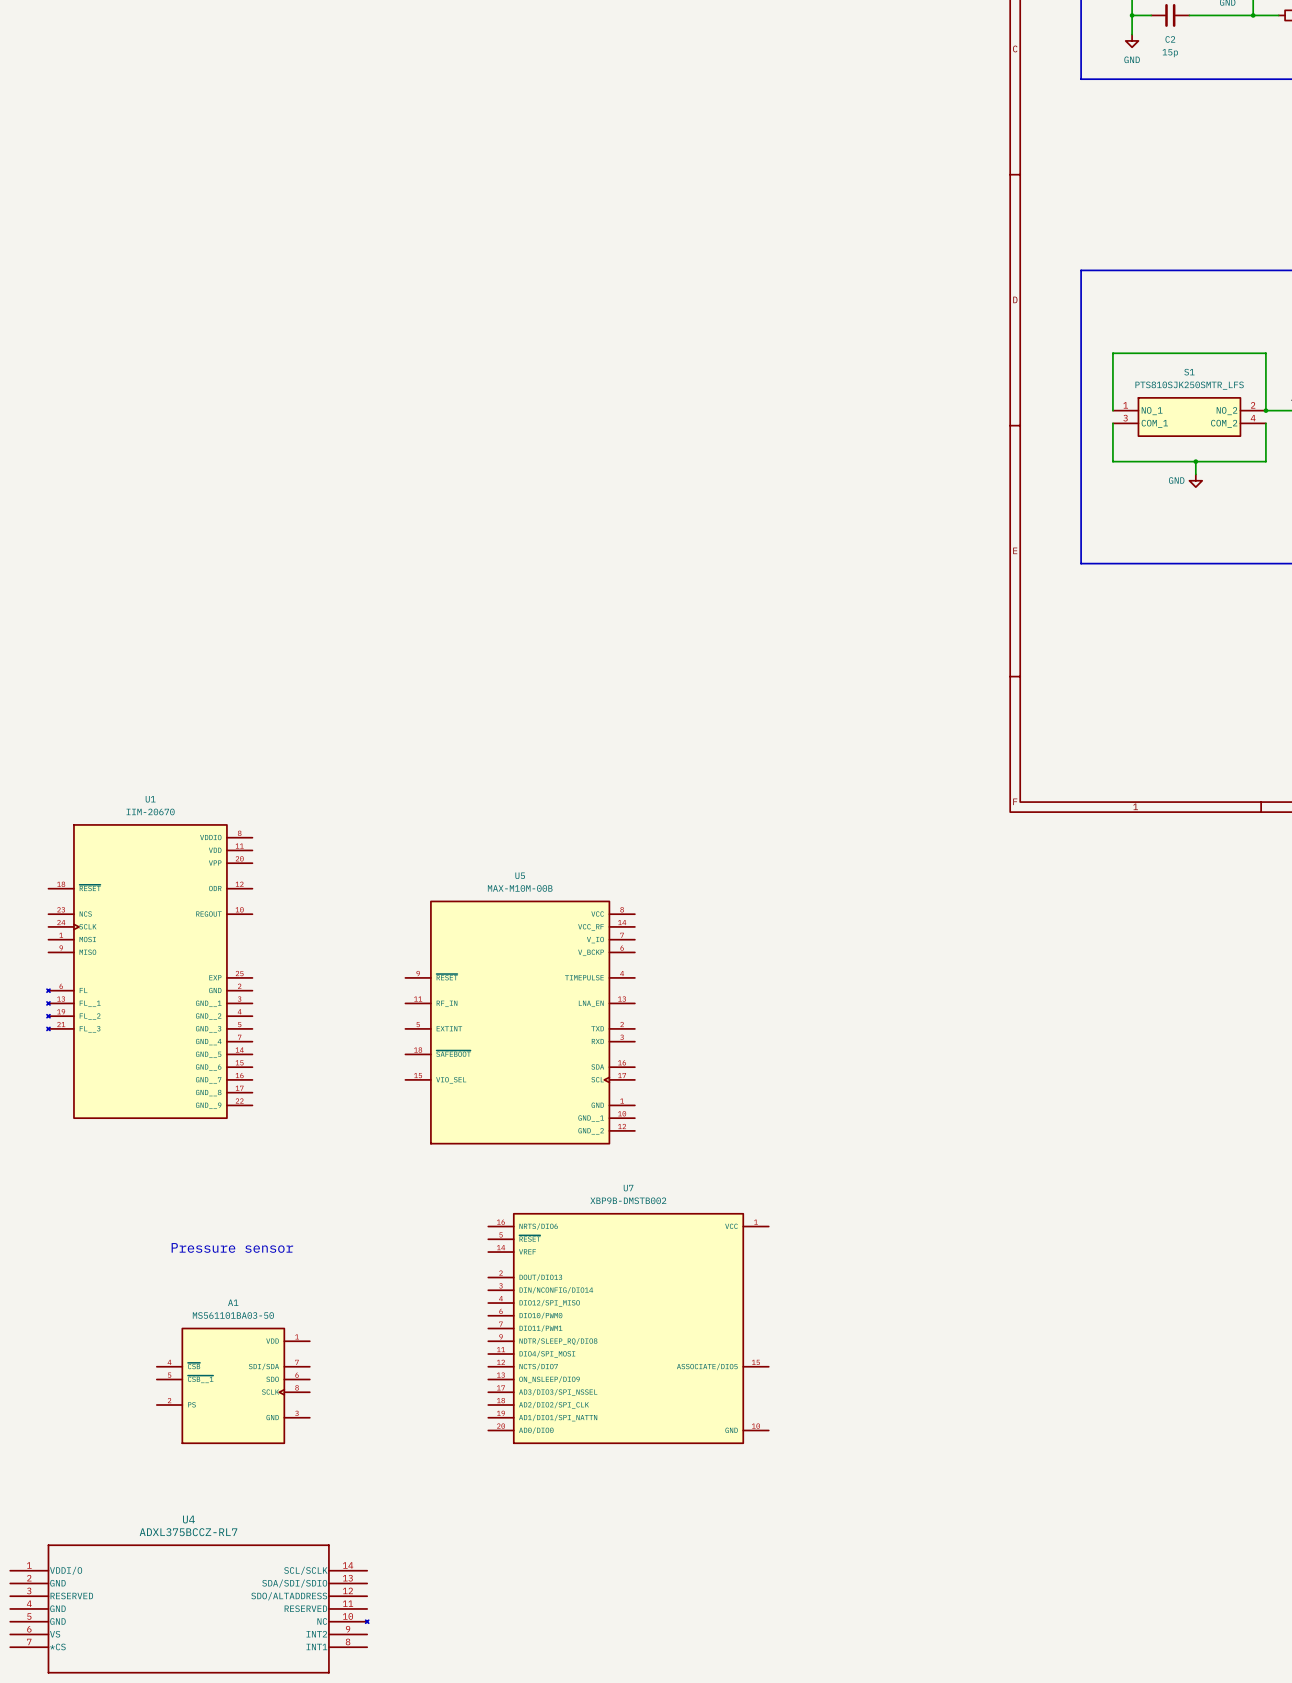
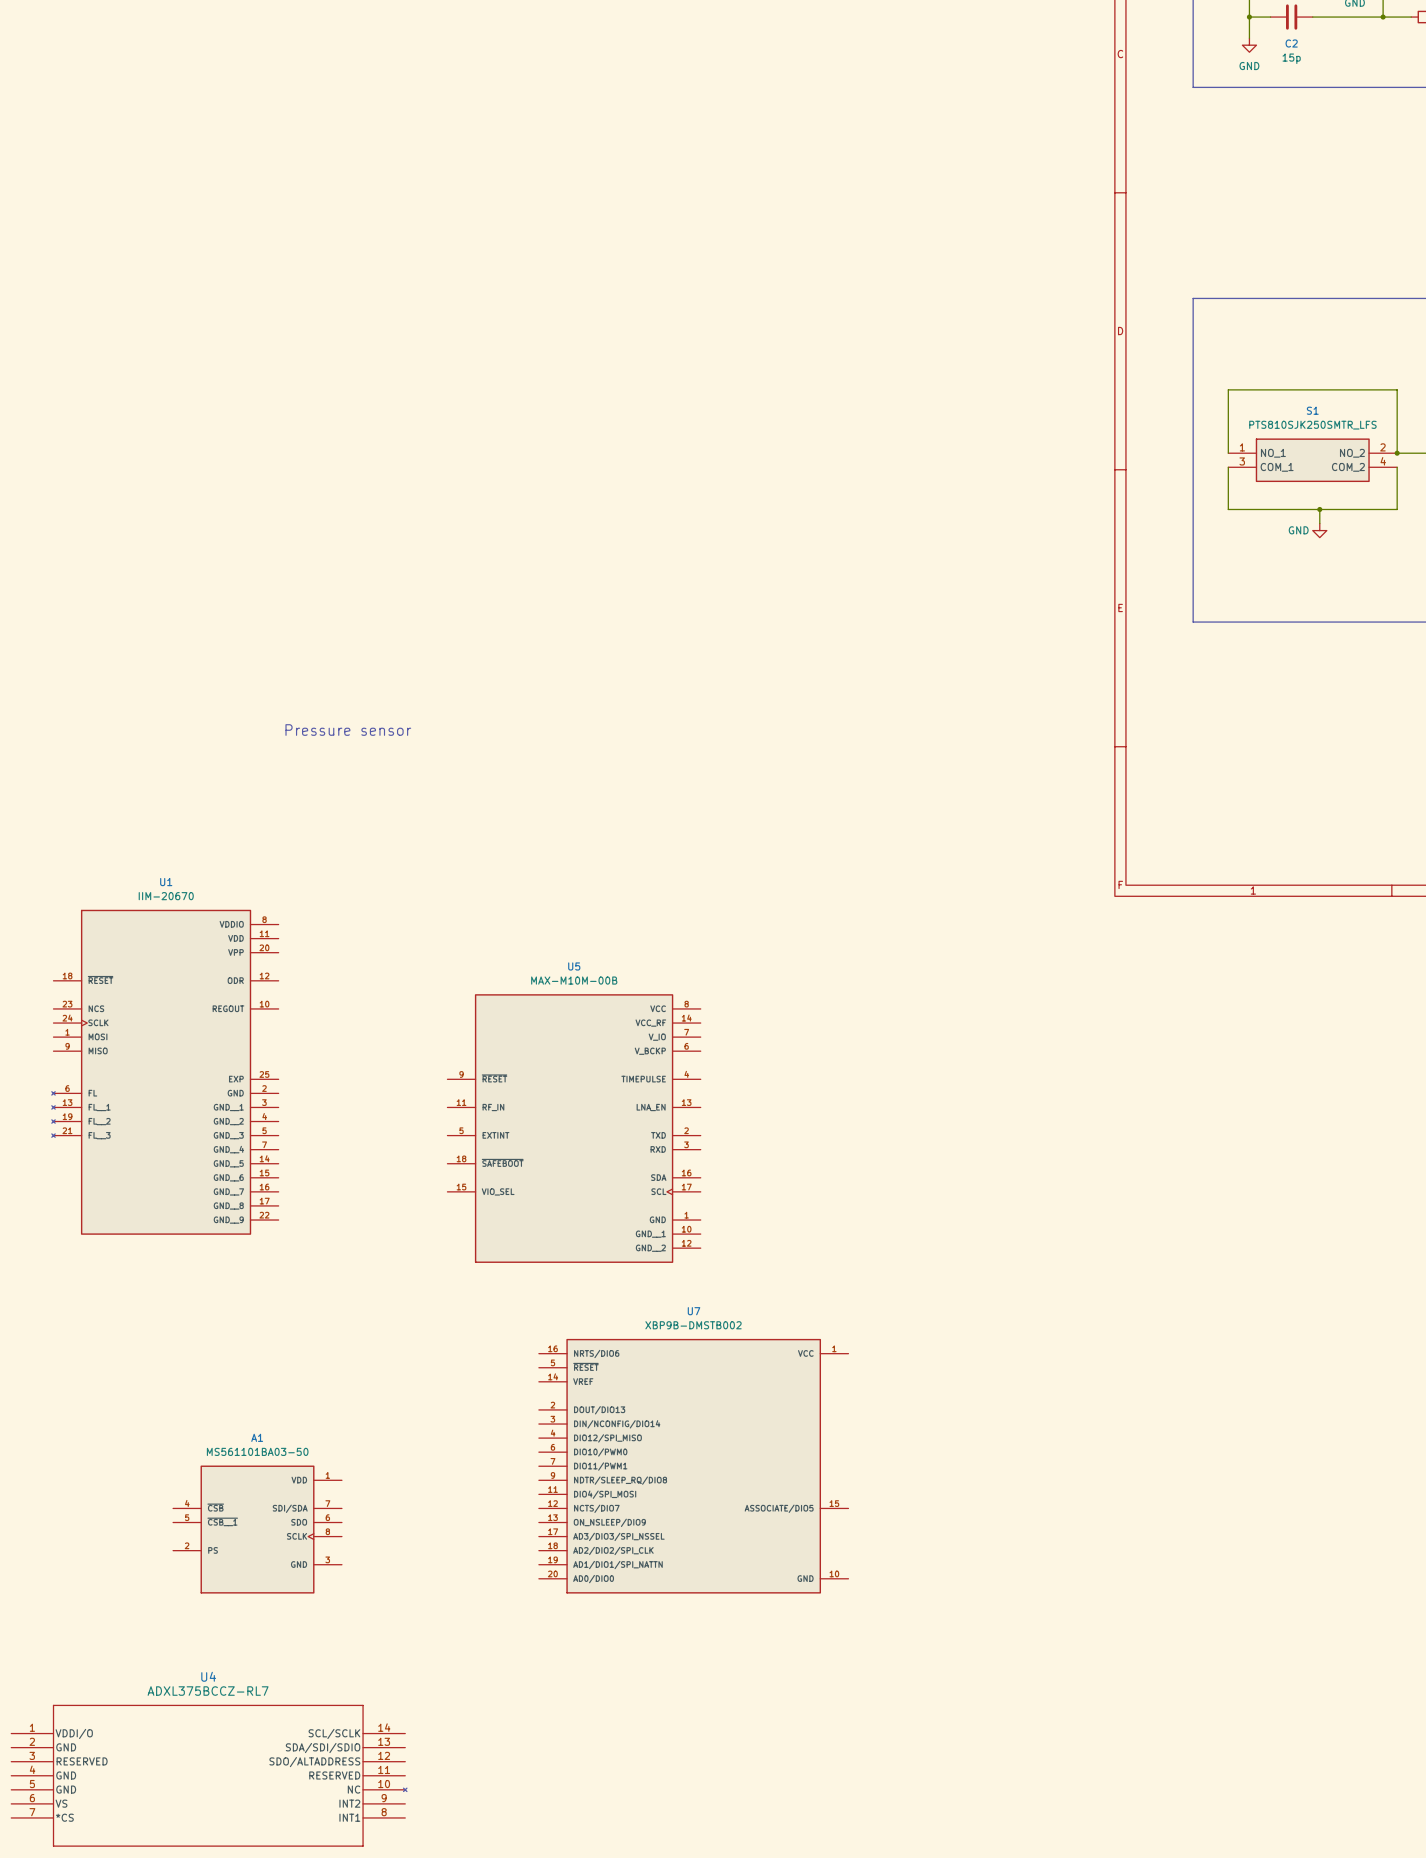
text: none -> Pressure sensor (348, 730)
text: Pressure sensor (232, 1247) -> none

